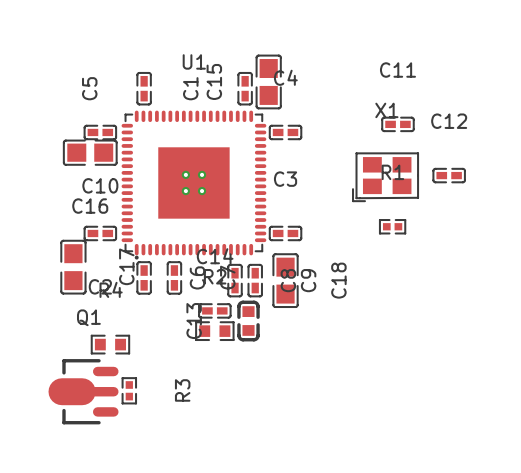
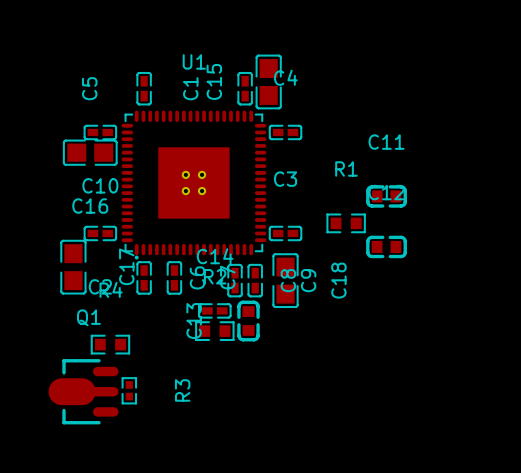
C11 footprint: [381, 116, 415, 133] -> [366, 185, 407, 208]
C12 footprint: [432, 167, 466, 184] -> [366, 235, 407, 259]
X1: (385, 177) -> none
R1 footprint: [378, 219, 407, 235] -> [326, 213, 366, 234]

